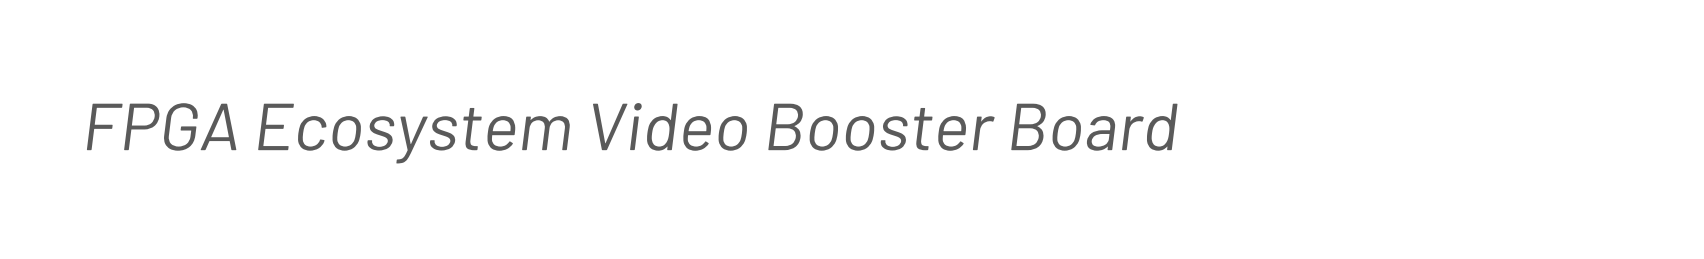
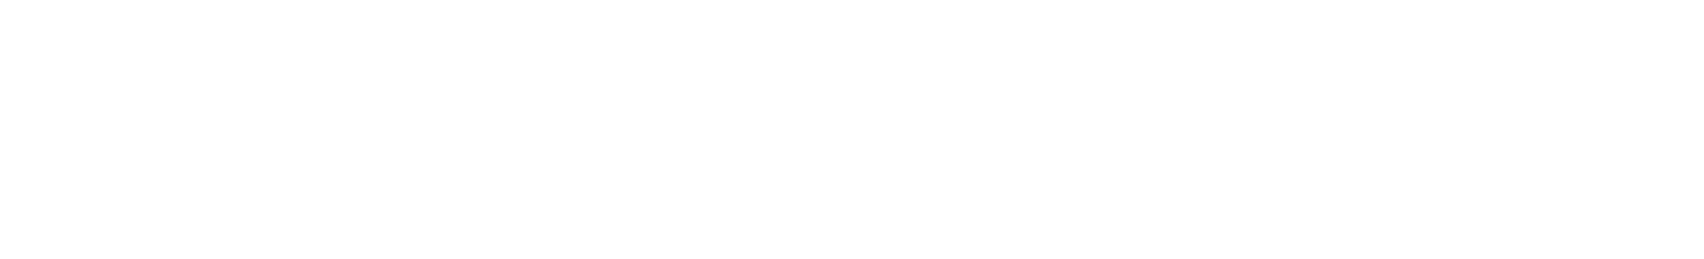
text: FPGA Ecosystem Video Booster Board (632, 133) -> none

